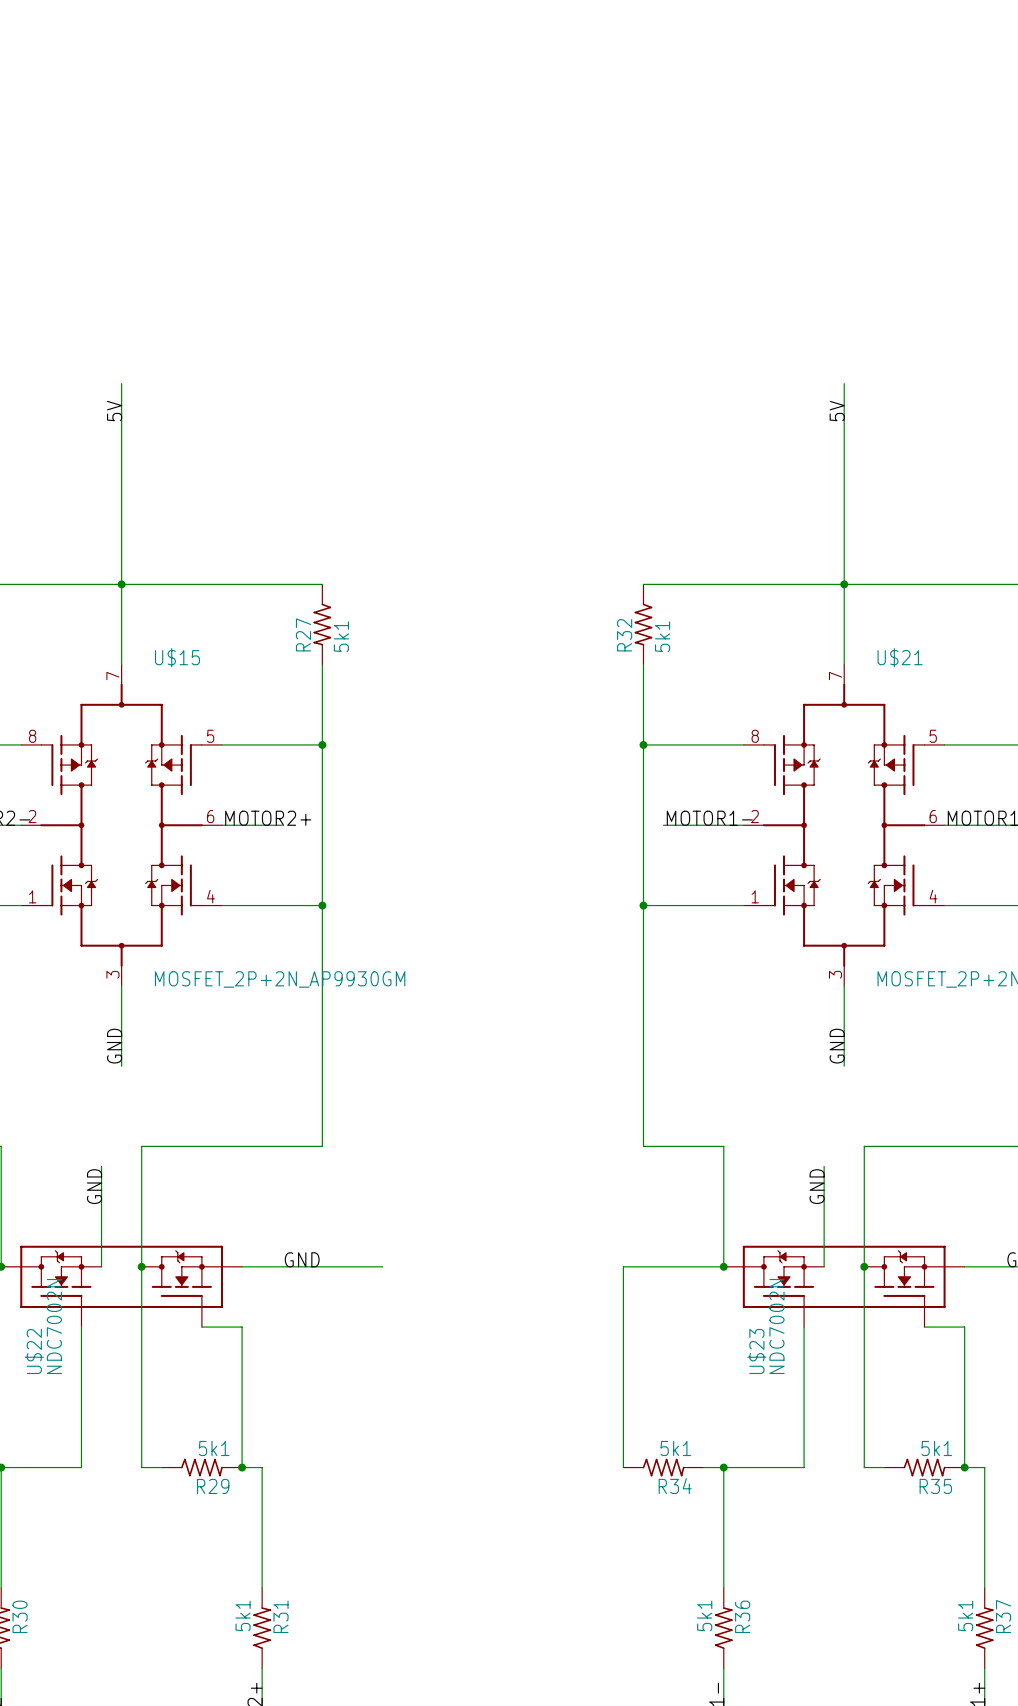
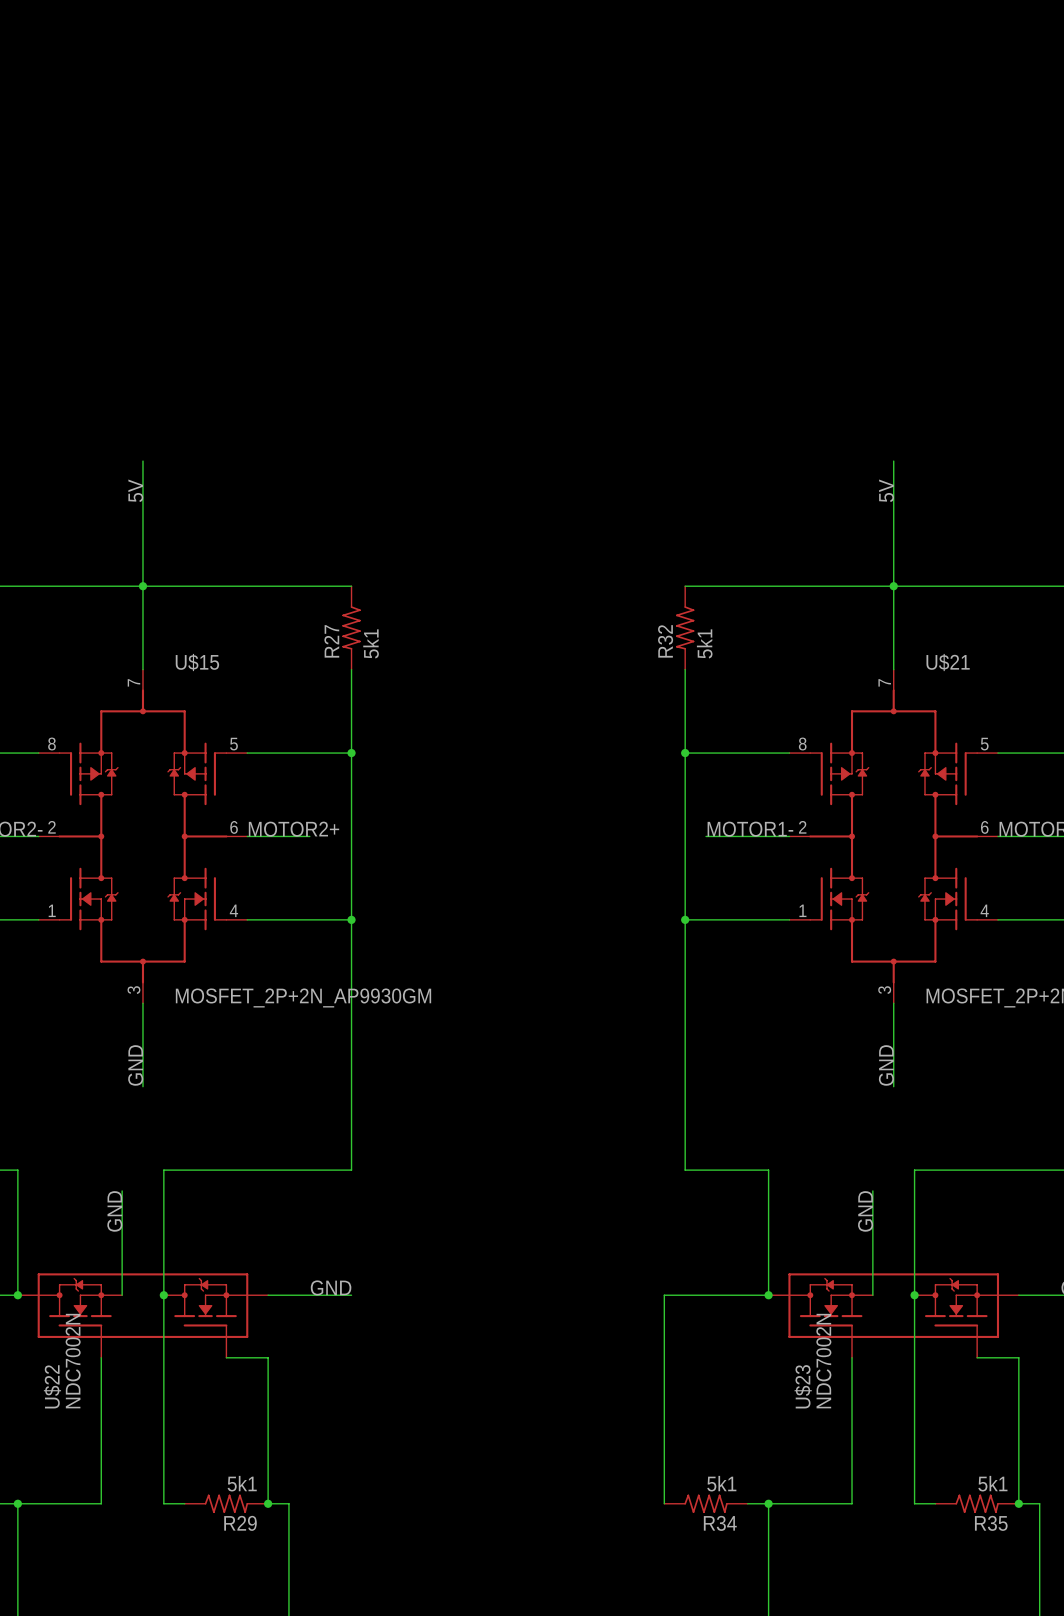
wire: (121, 383) (121, 463) -> none
wire: (844, 383) (844, 463) -> none
label position: 5V (114, 411) -> 5V (135, 490)
label position: 5V (837, 411) -> 5V (886, 490)
wire: (322, 1266) (382, 1266) -> none

